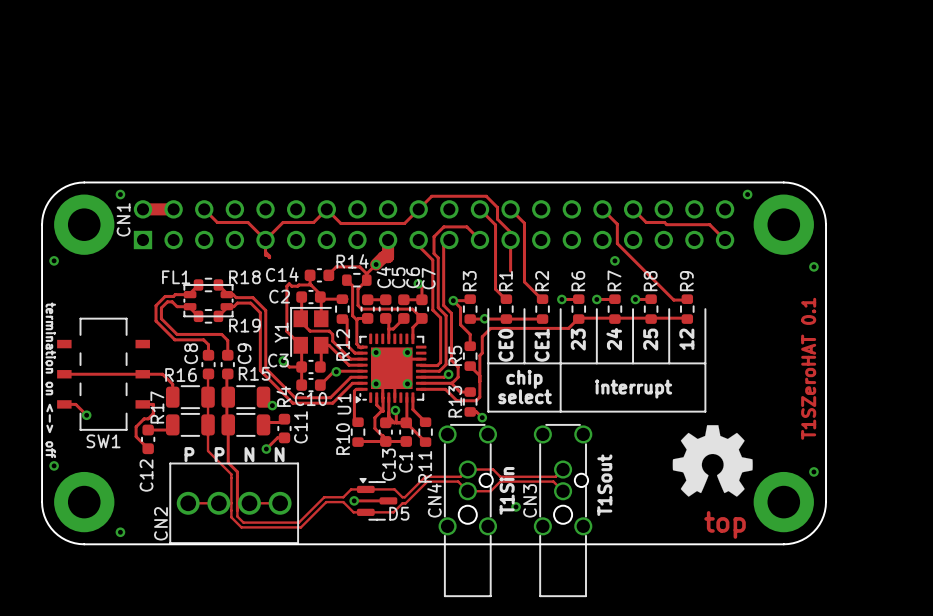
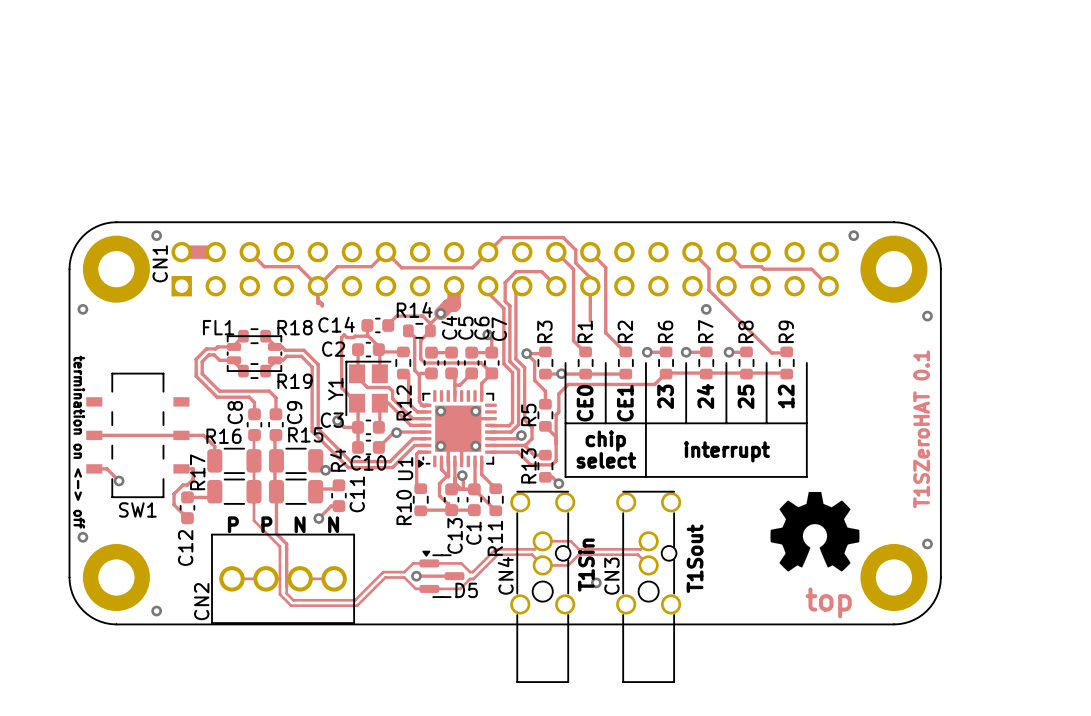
CN4 footprint: [438, 424, 498, 597] -> [510, 491, 576, 683]
CN3 footprint: [533, 424, 593, 597] -> [616, 491, 682, 683]

